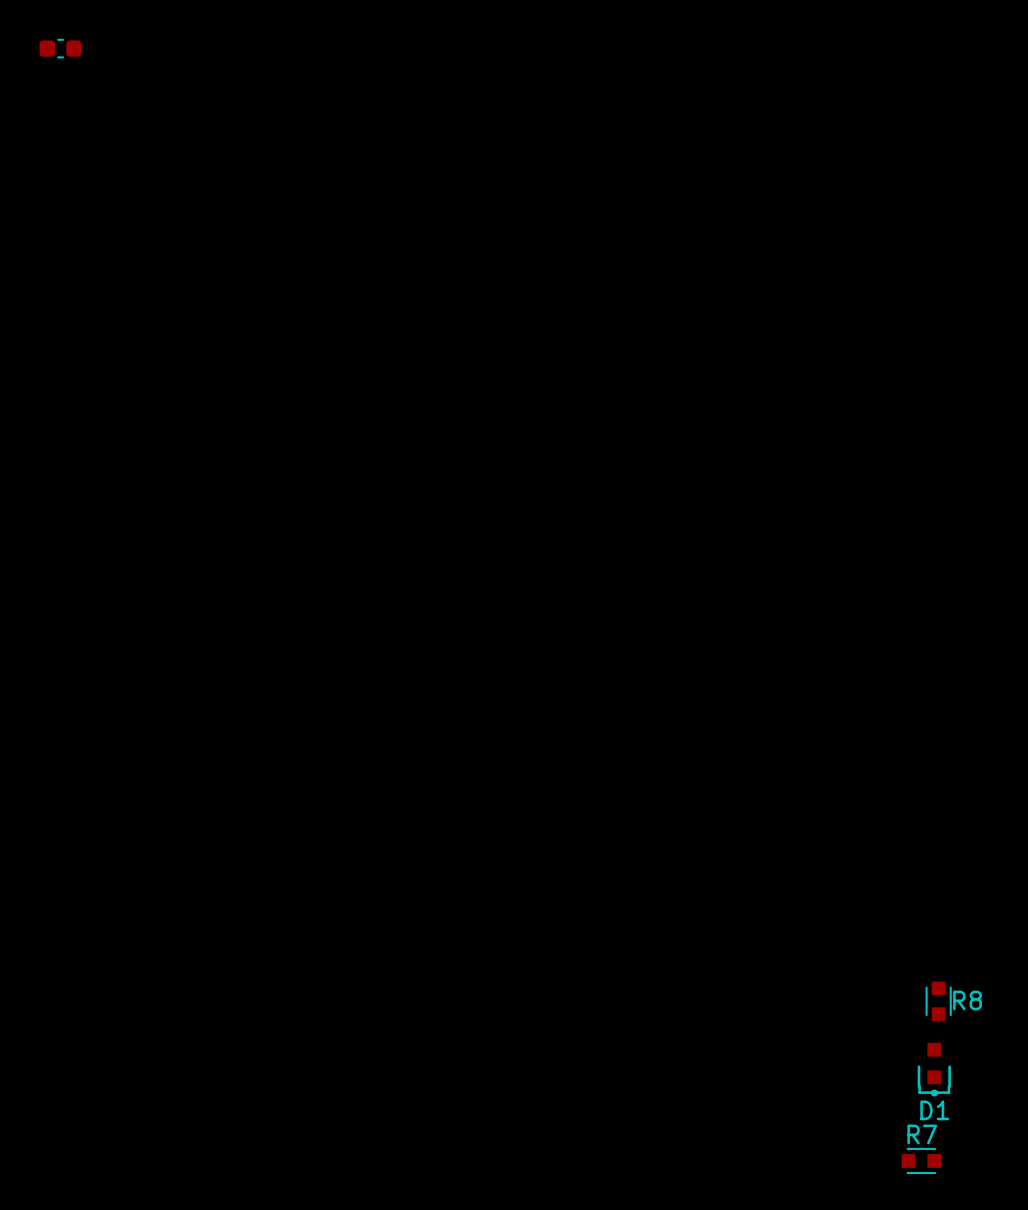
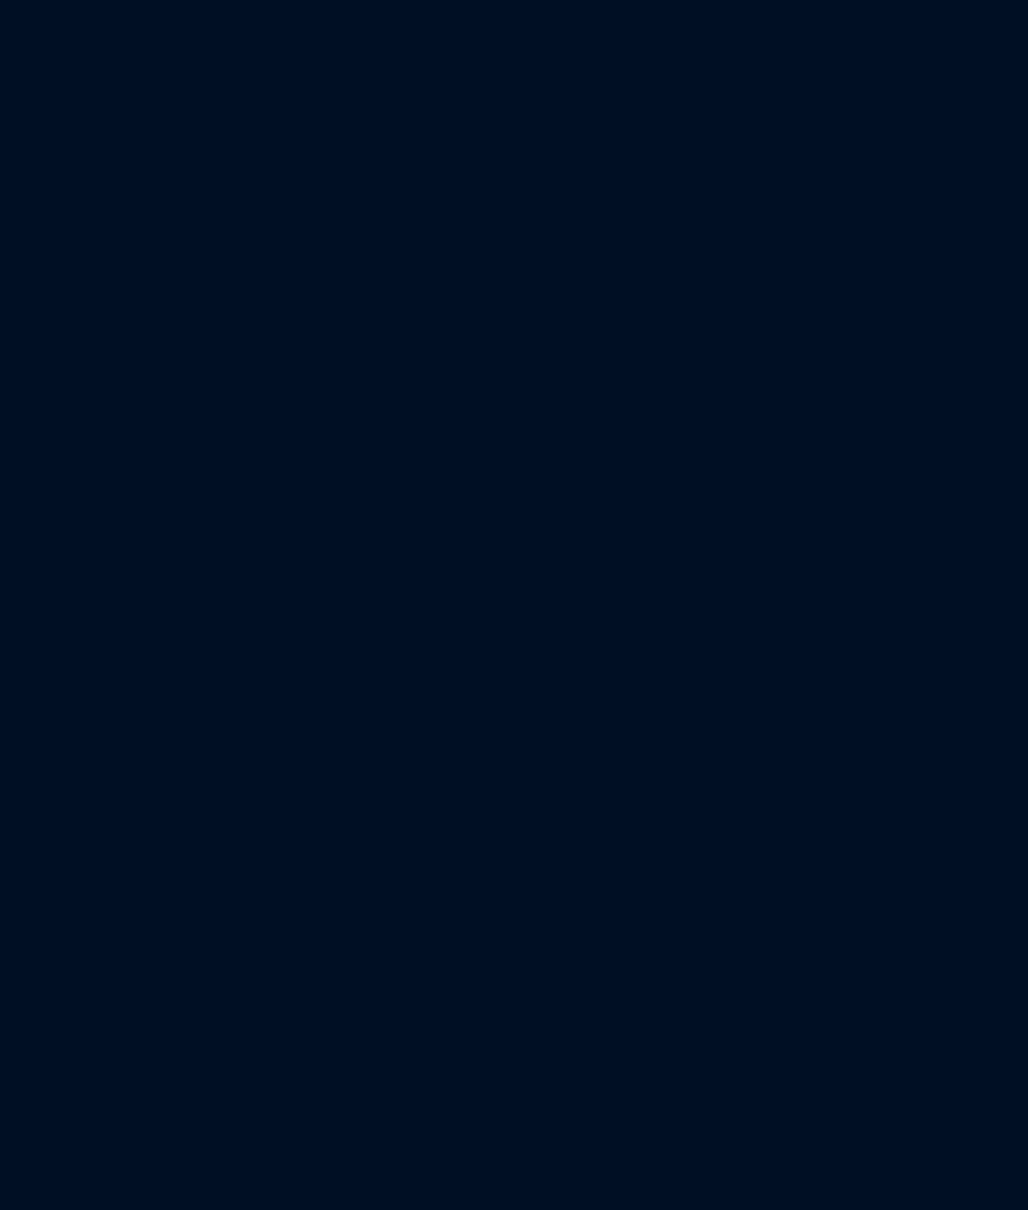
part: (60, 48) -> none
R8: (938, 1001) -> none
D1: (934, 1069) -> none
R7: (921, 1160) -> none

